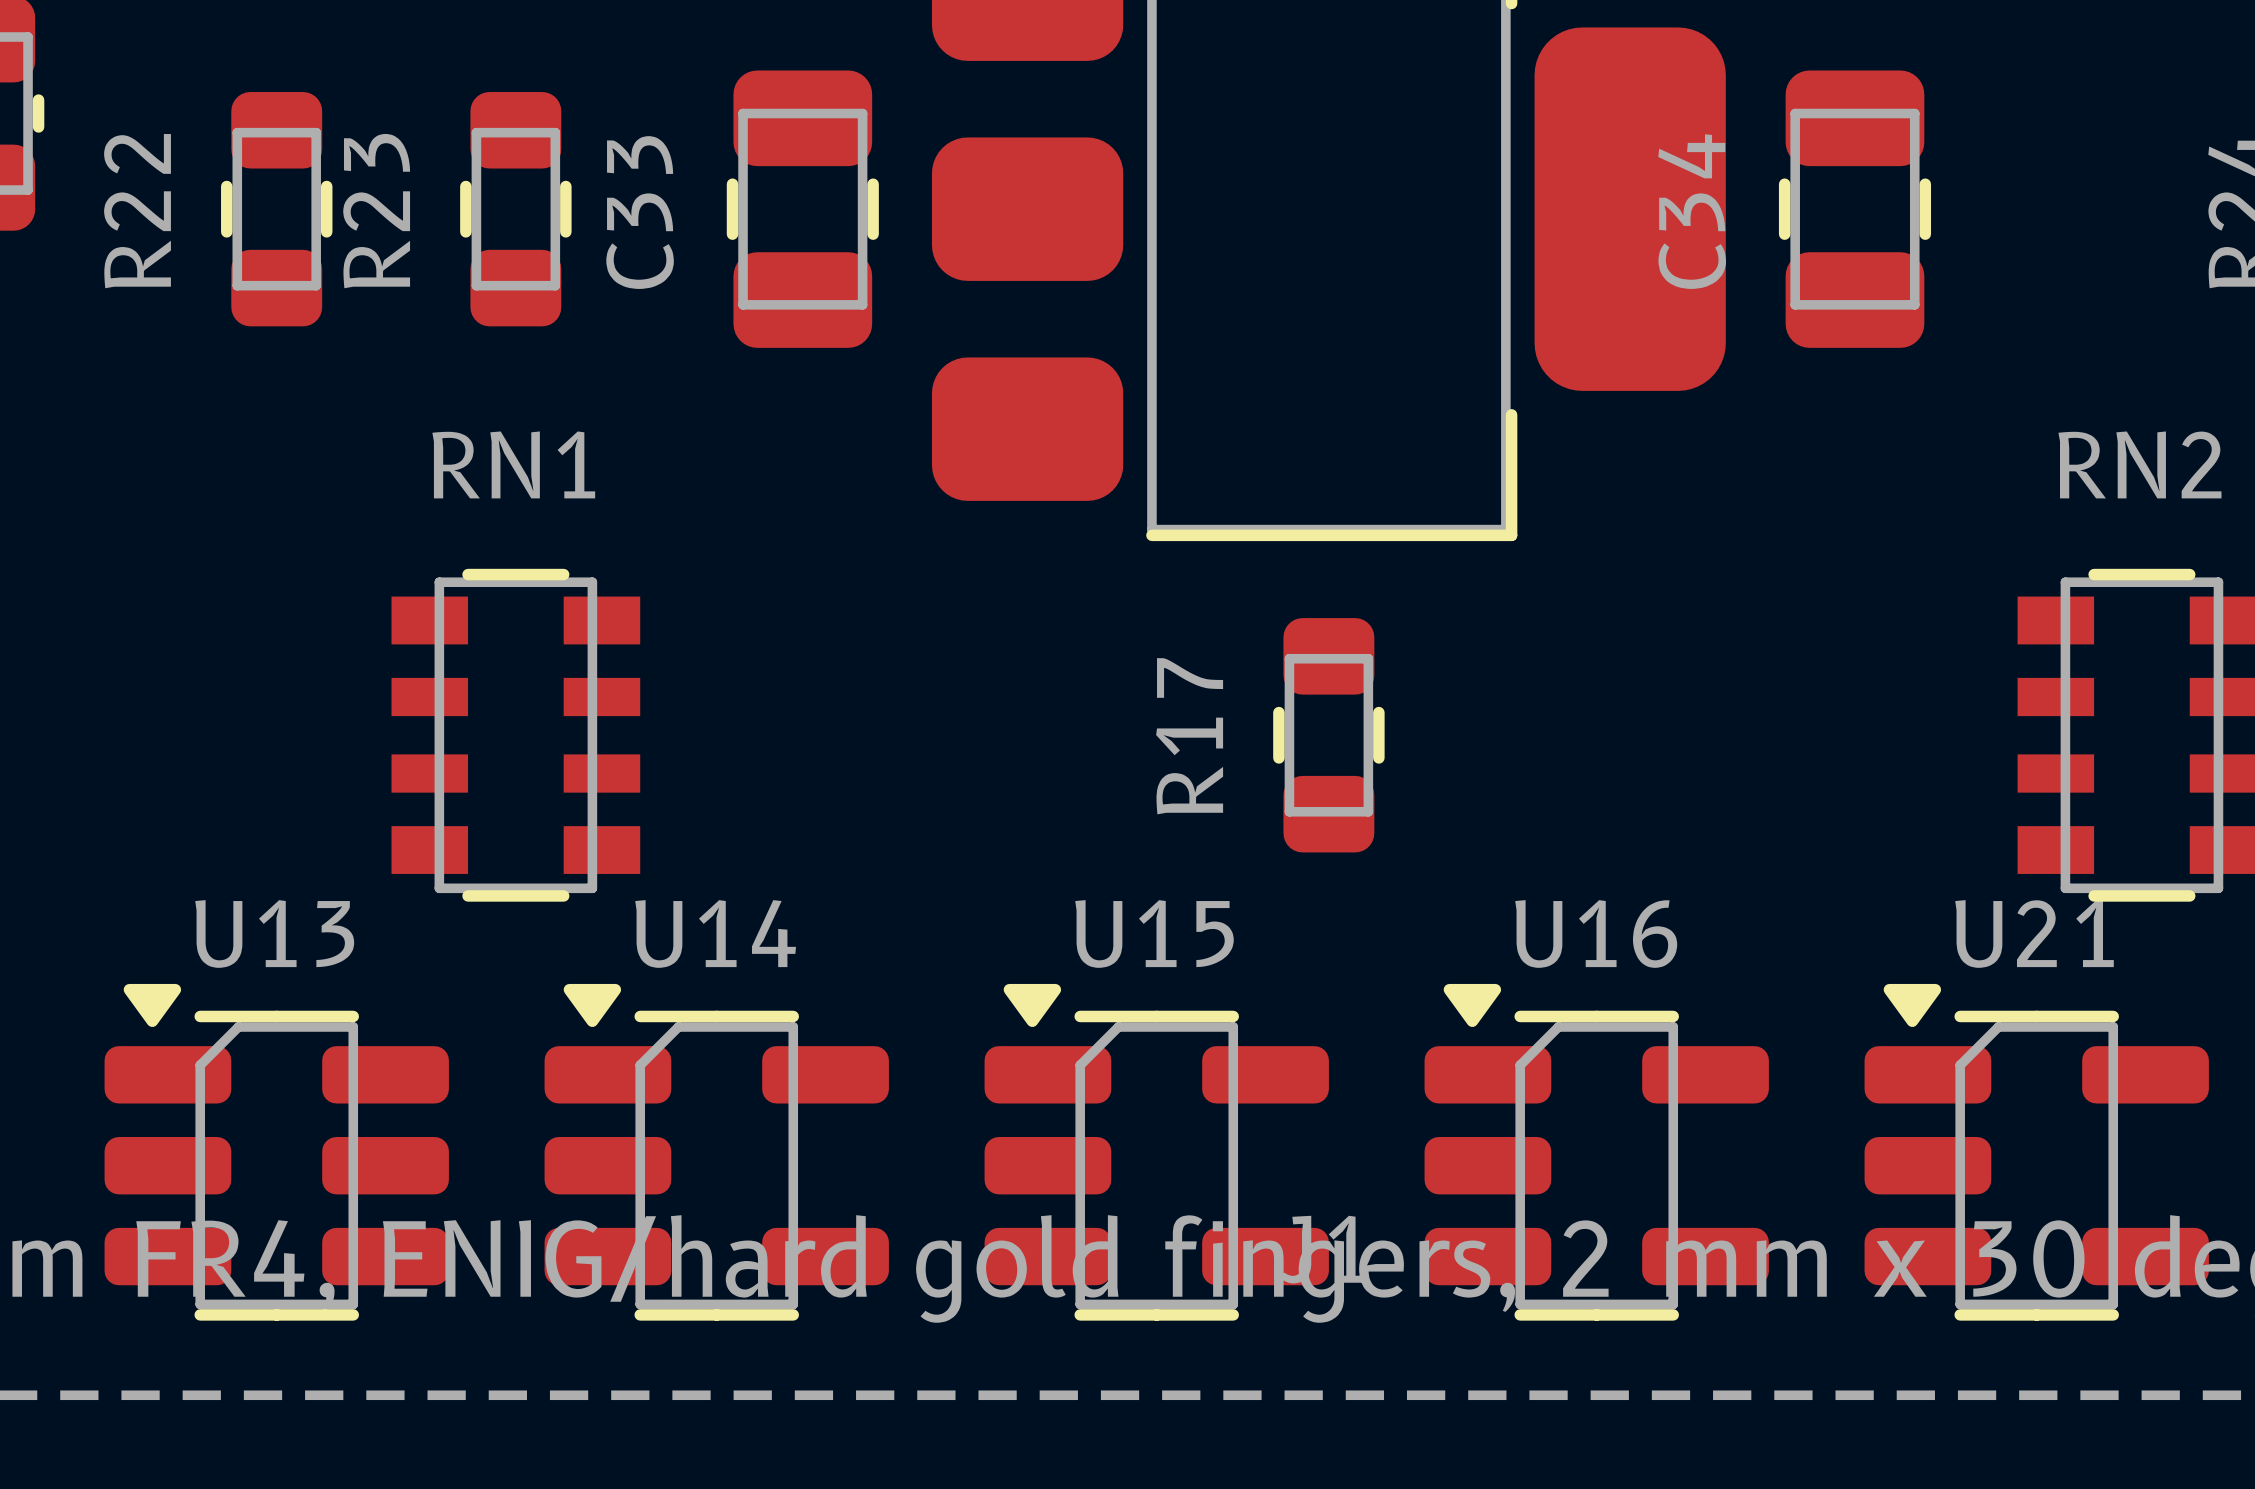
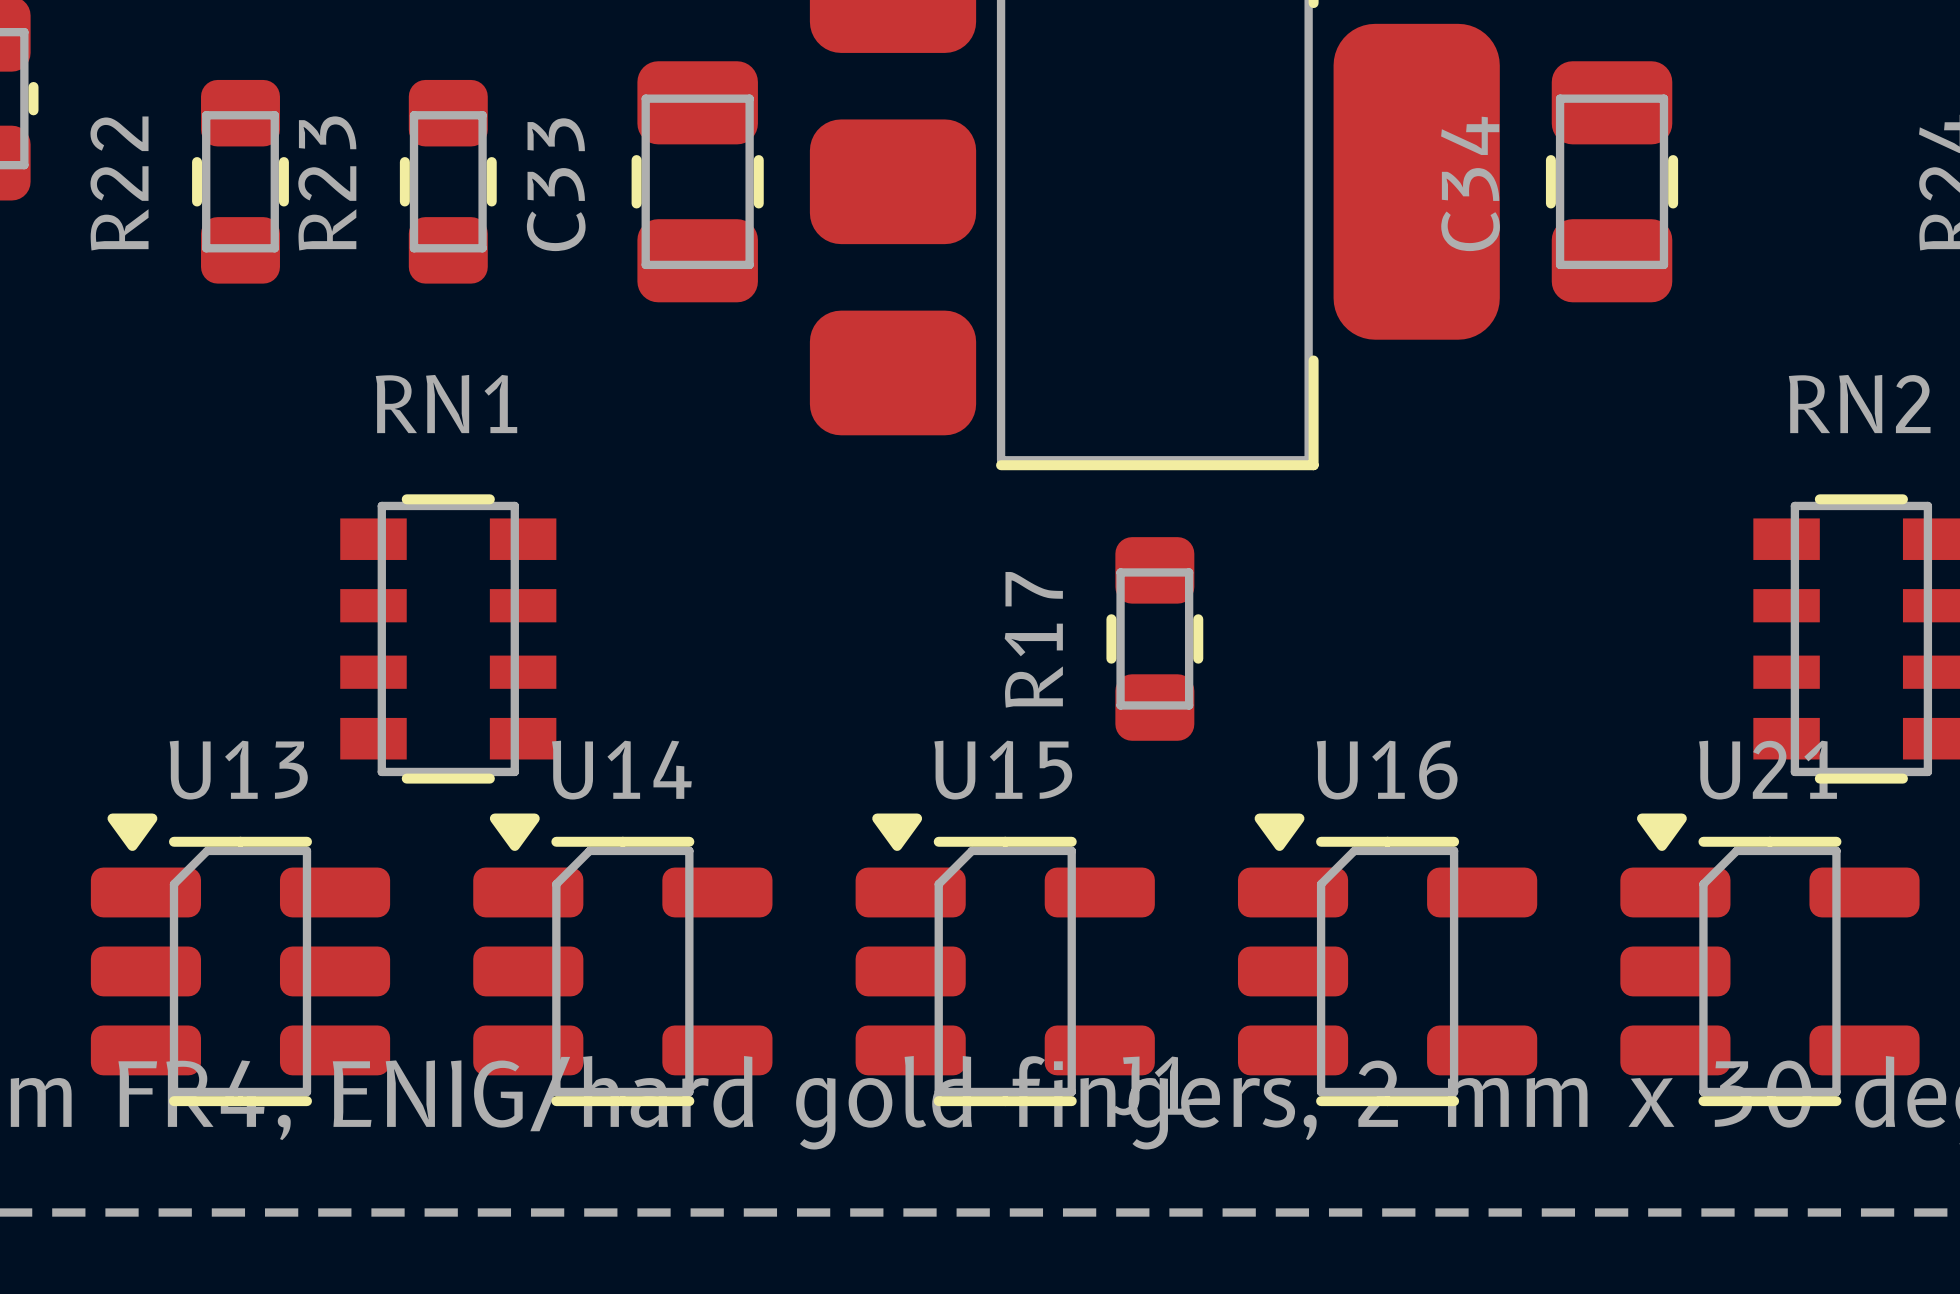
U13 position: (276, 1152) -> (240, 959)
U14 position: (716, 1152) -> (622, 959)
U15 position: (1156, 1152) -> (1005, 959)
U16 position: (1596, 1152) -> (1387, 959)
U21 position: (2036, 1152) -> (1769, 959)

